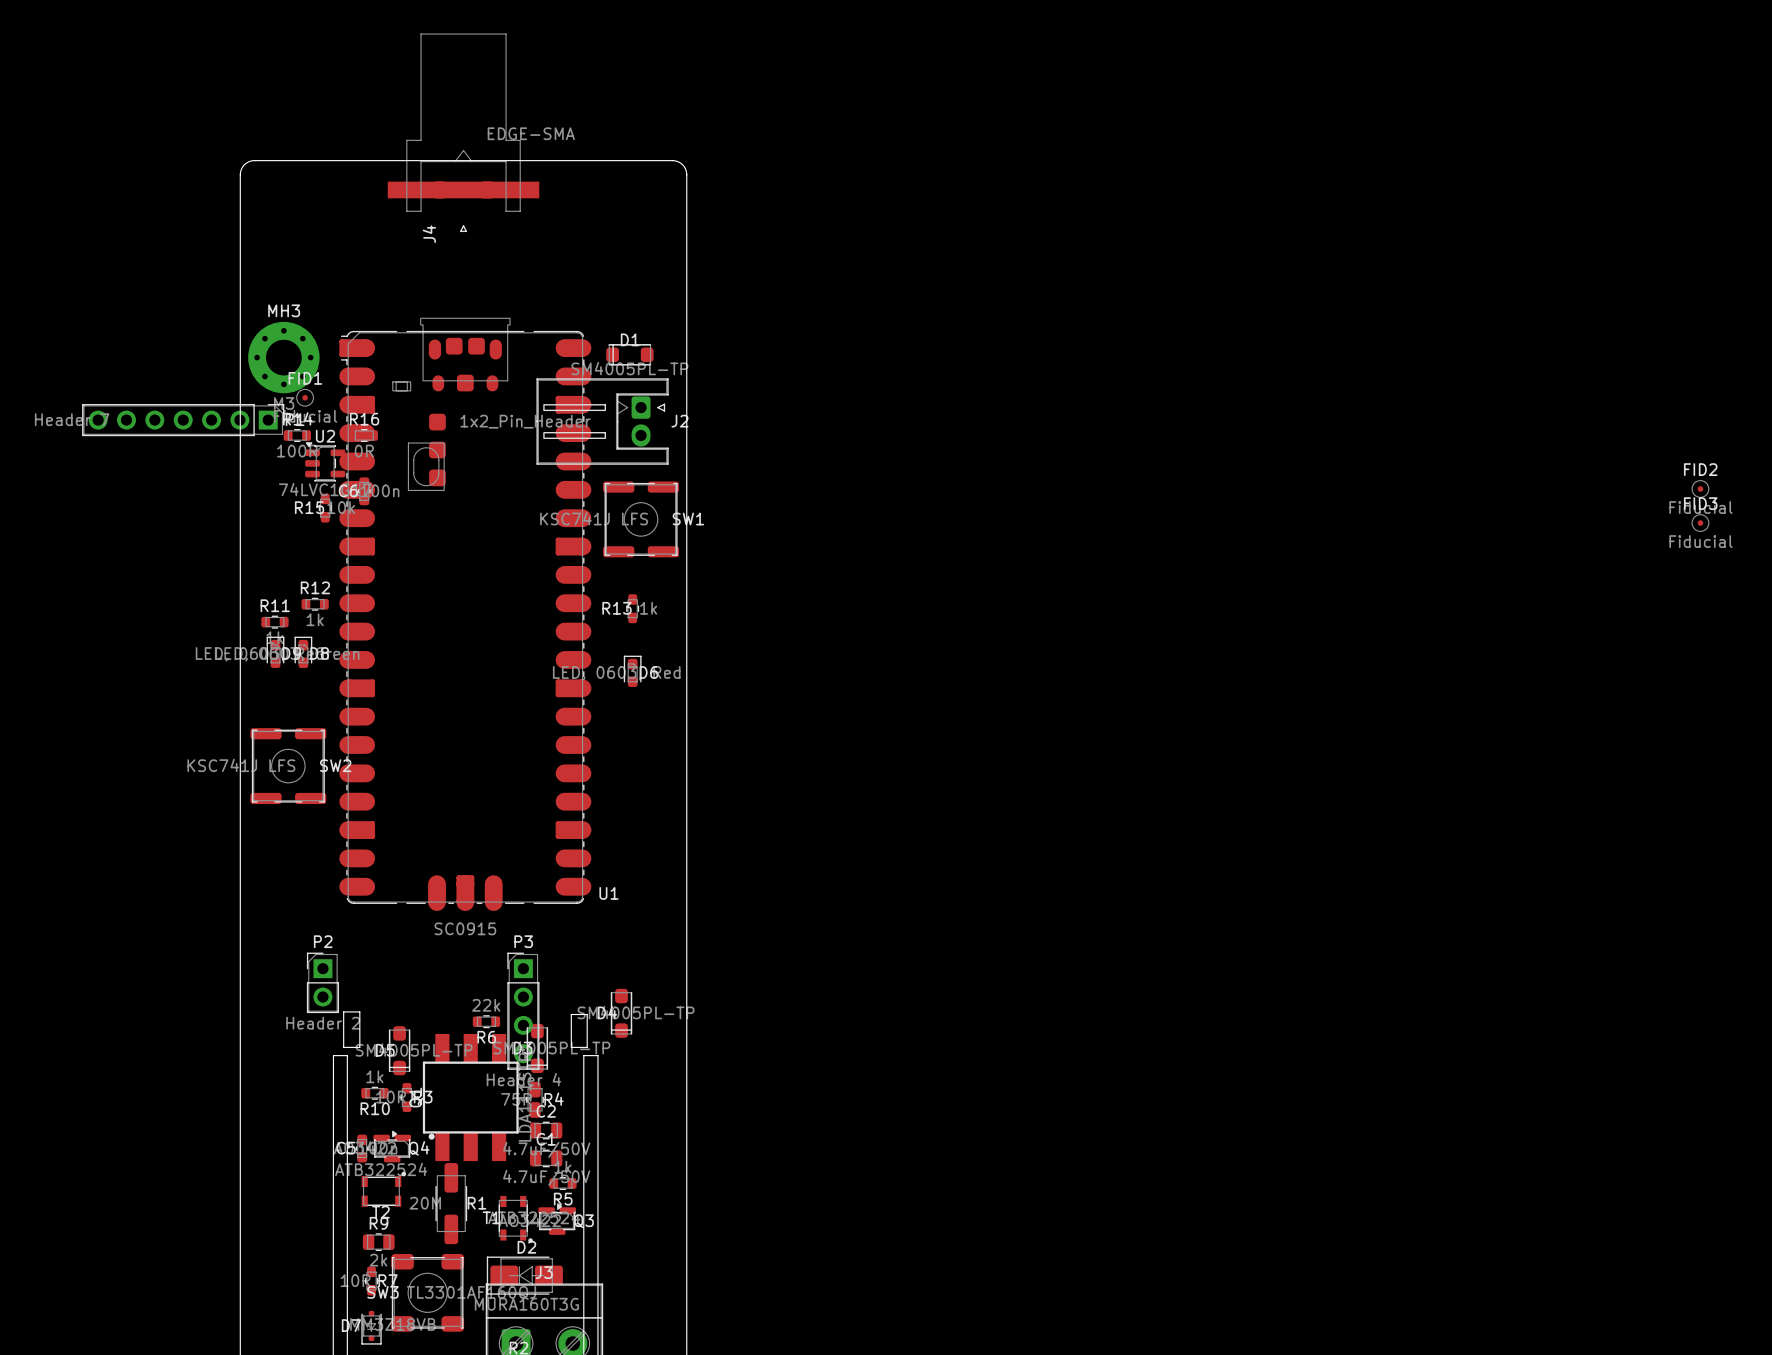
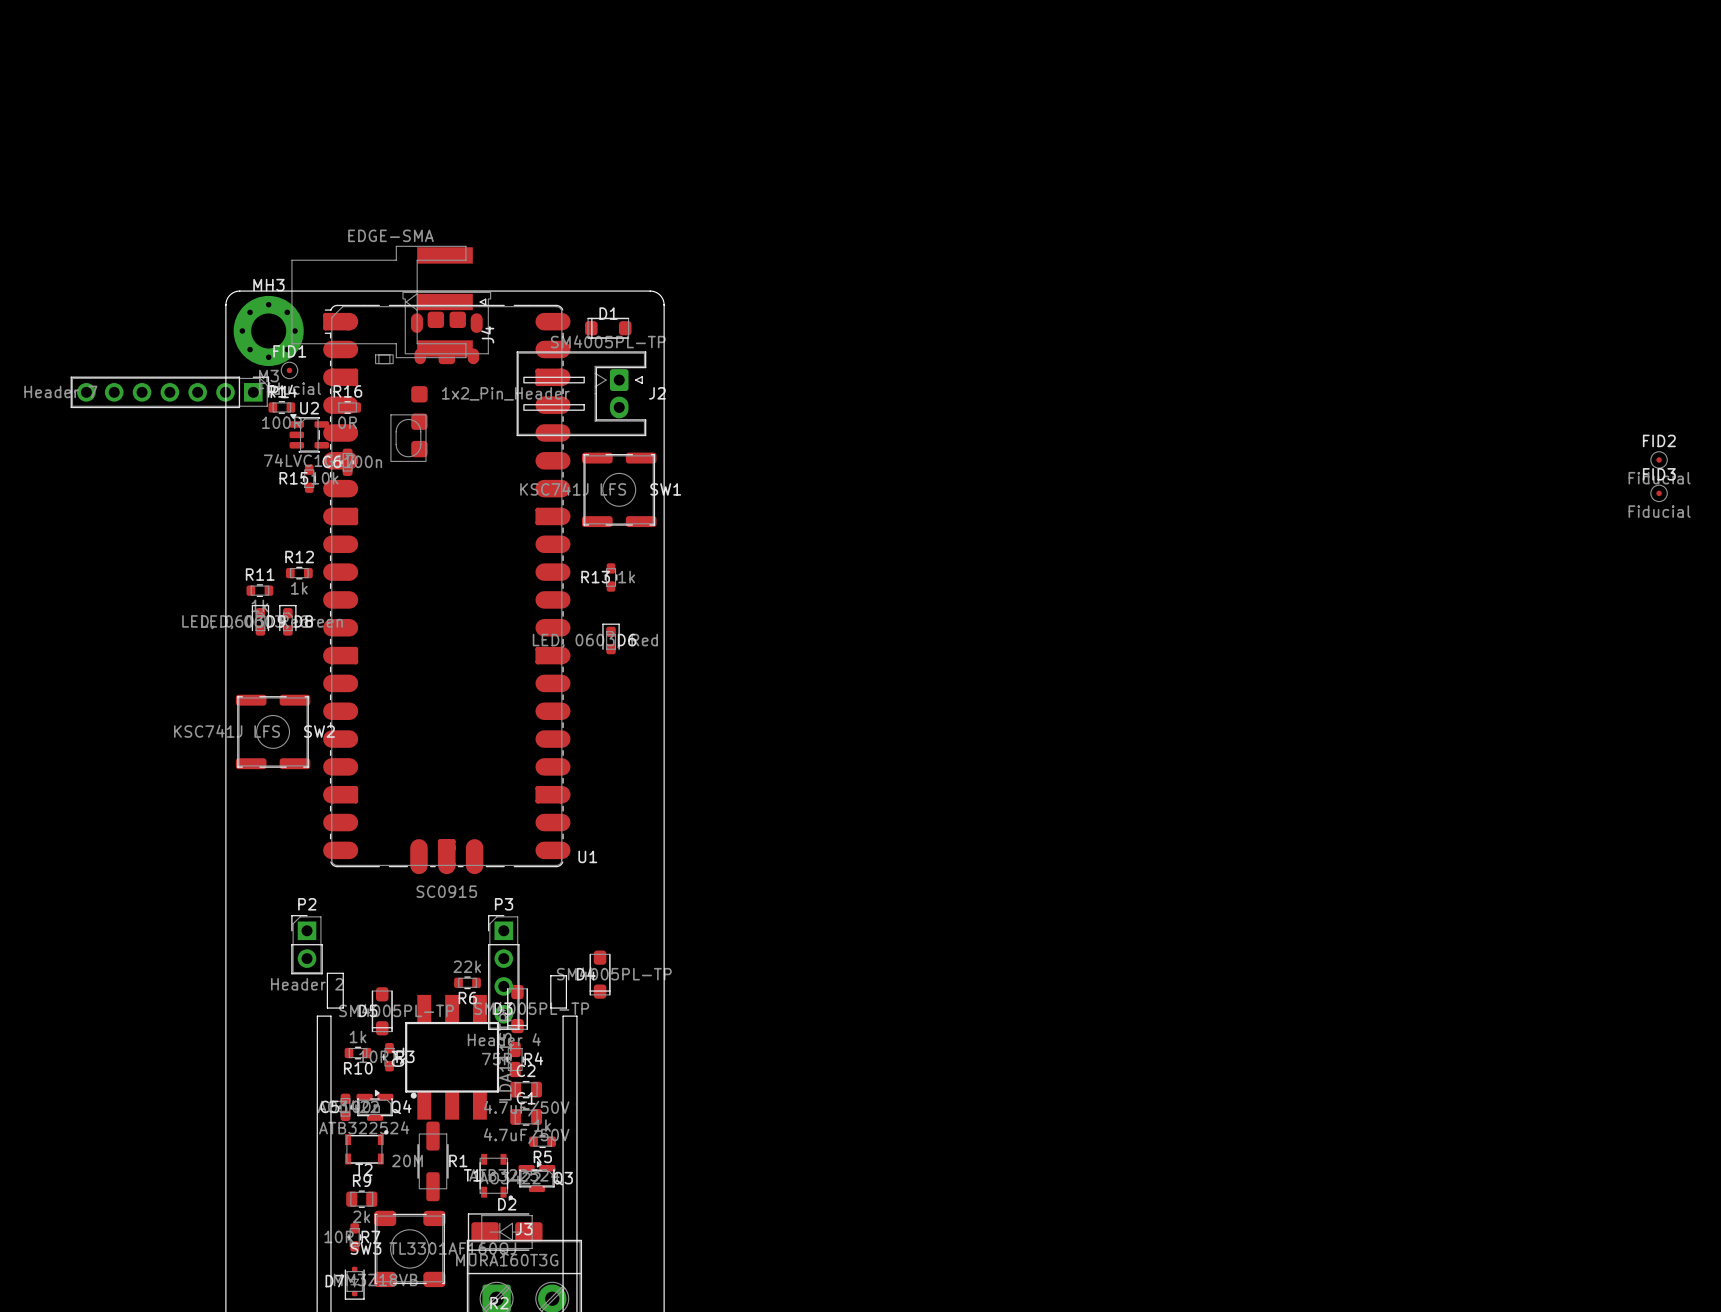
J4 footprint: [387, 33, 540, 233] -> [291, 245, 487, 359]
J4 value position: EDGE-SMA (531, 133) -> EDGE-SMA (391, 235)
board edge: (240, 174) (240, 330) -> (664, 304) (660, 295) (650, 291) (239, 291) (229, 295) (225, 304)
board edge: (240, 174) (244, 164) (254, 160) (672, 160) (682, 164) (686, 174) -> none
board edge: (686, 174) (686, 330) -> none
J4 name position: J4 (429, 234) -> J4 (487, 334)

